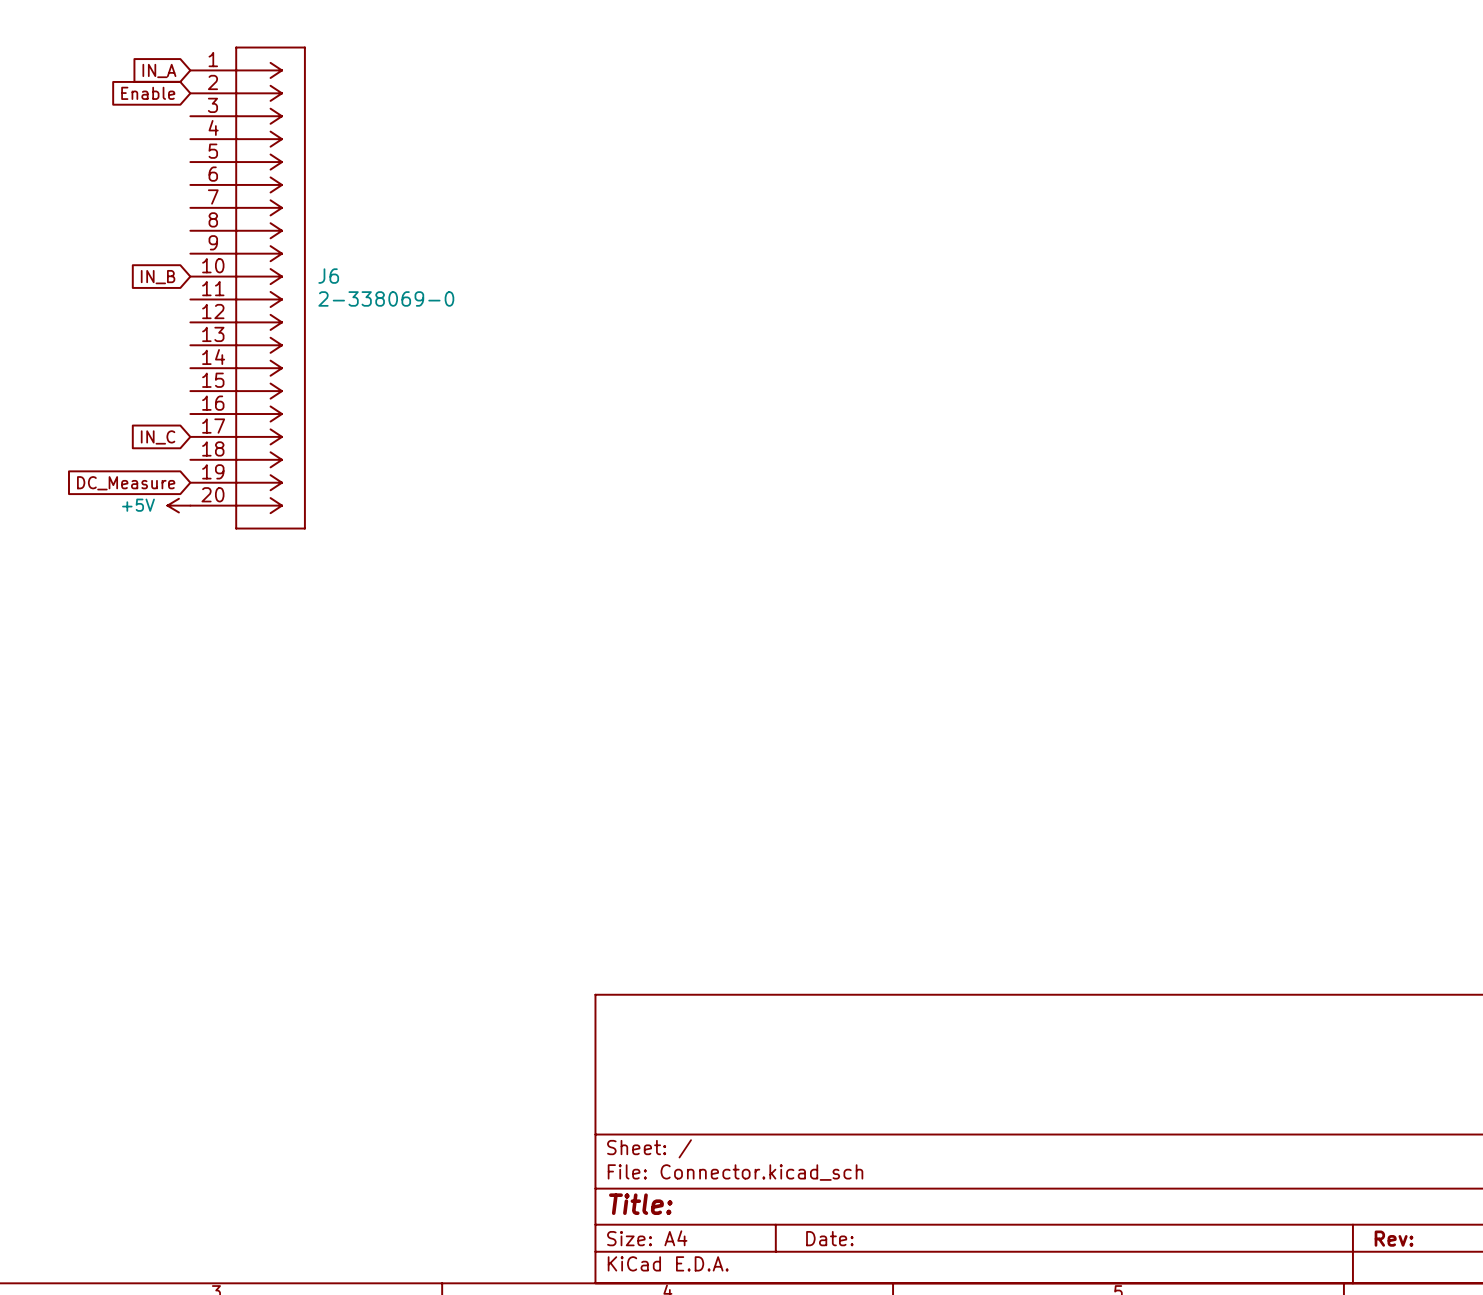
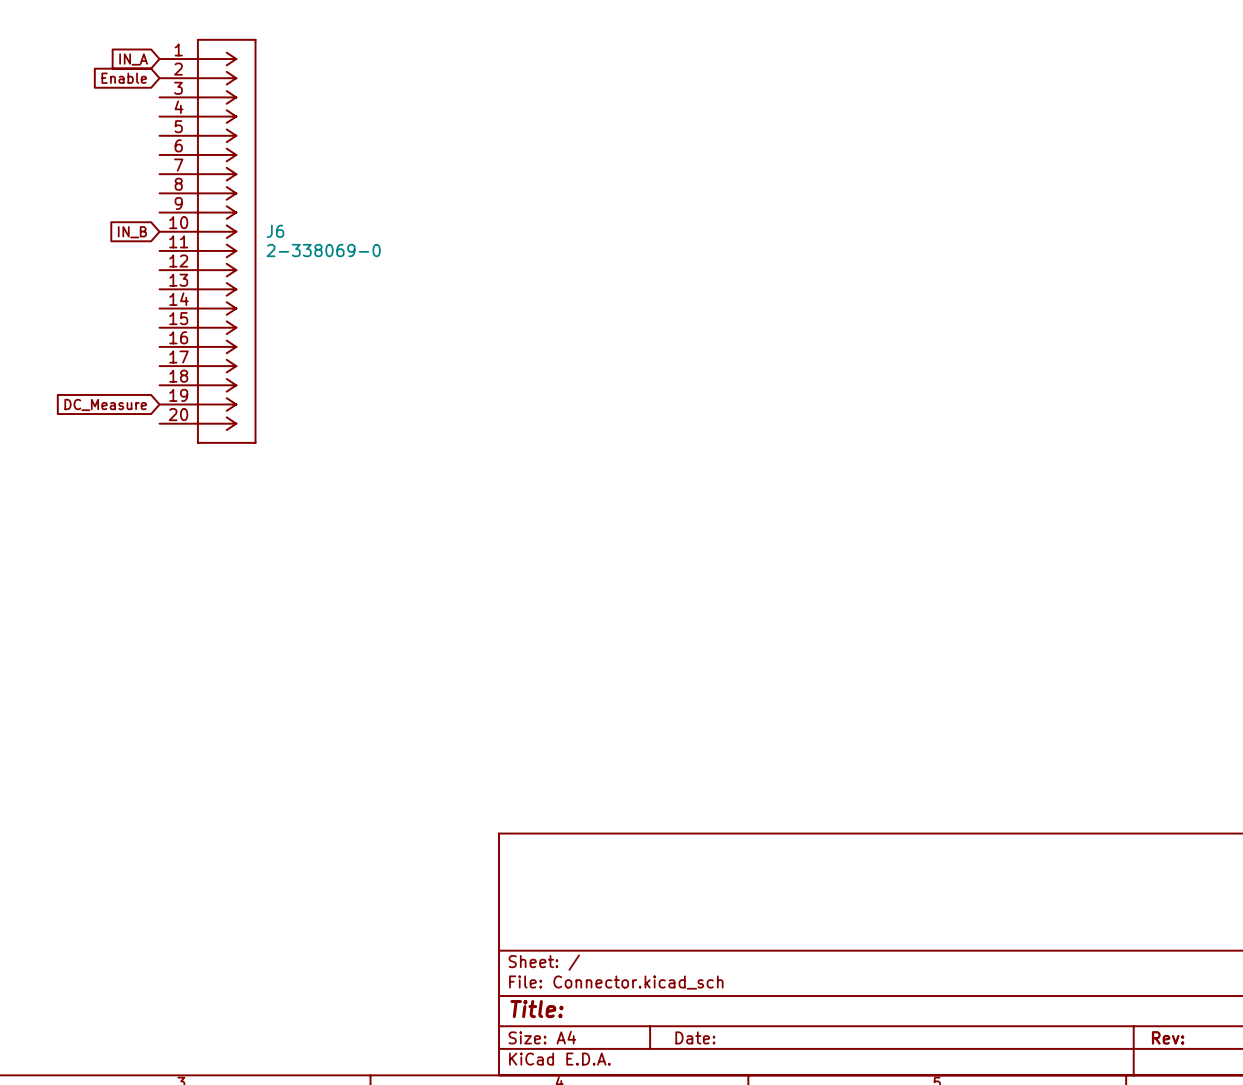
global label: IN_C (158, 437) -> none
power symbol: +5V (178, 505) -> none

